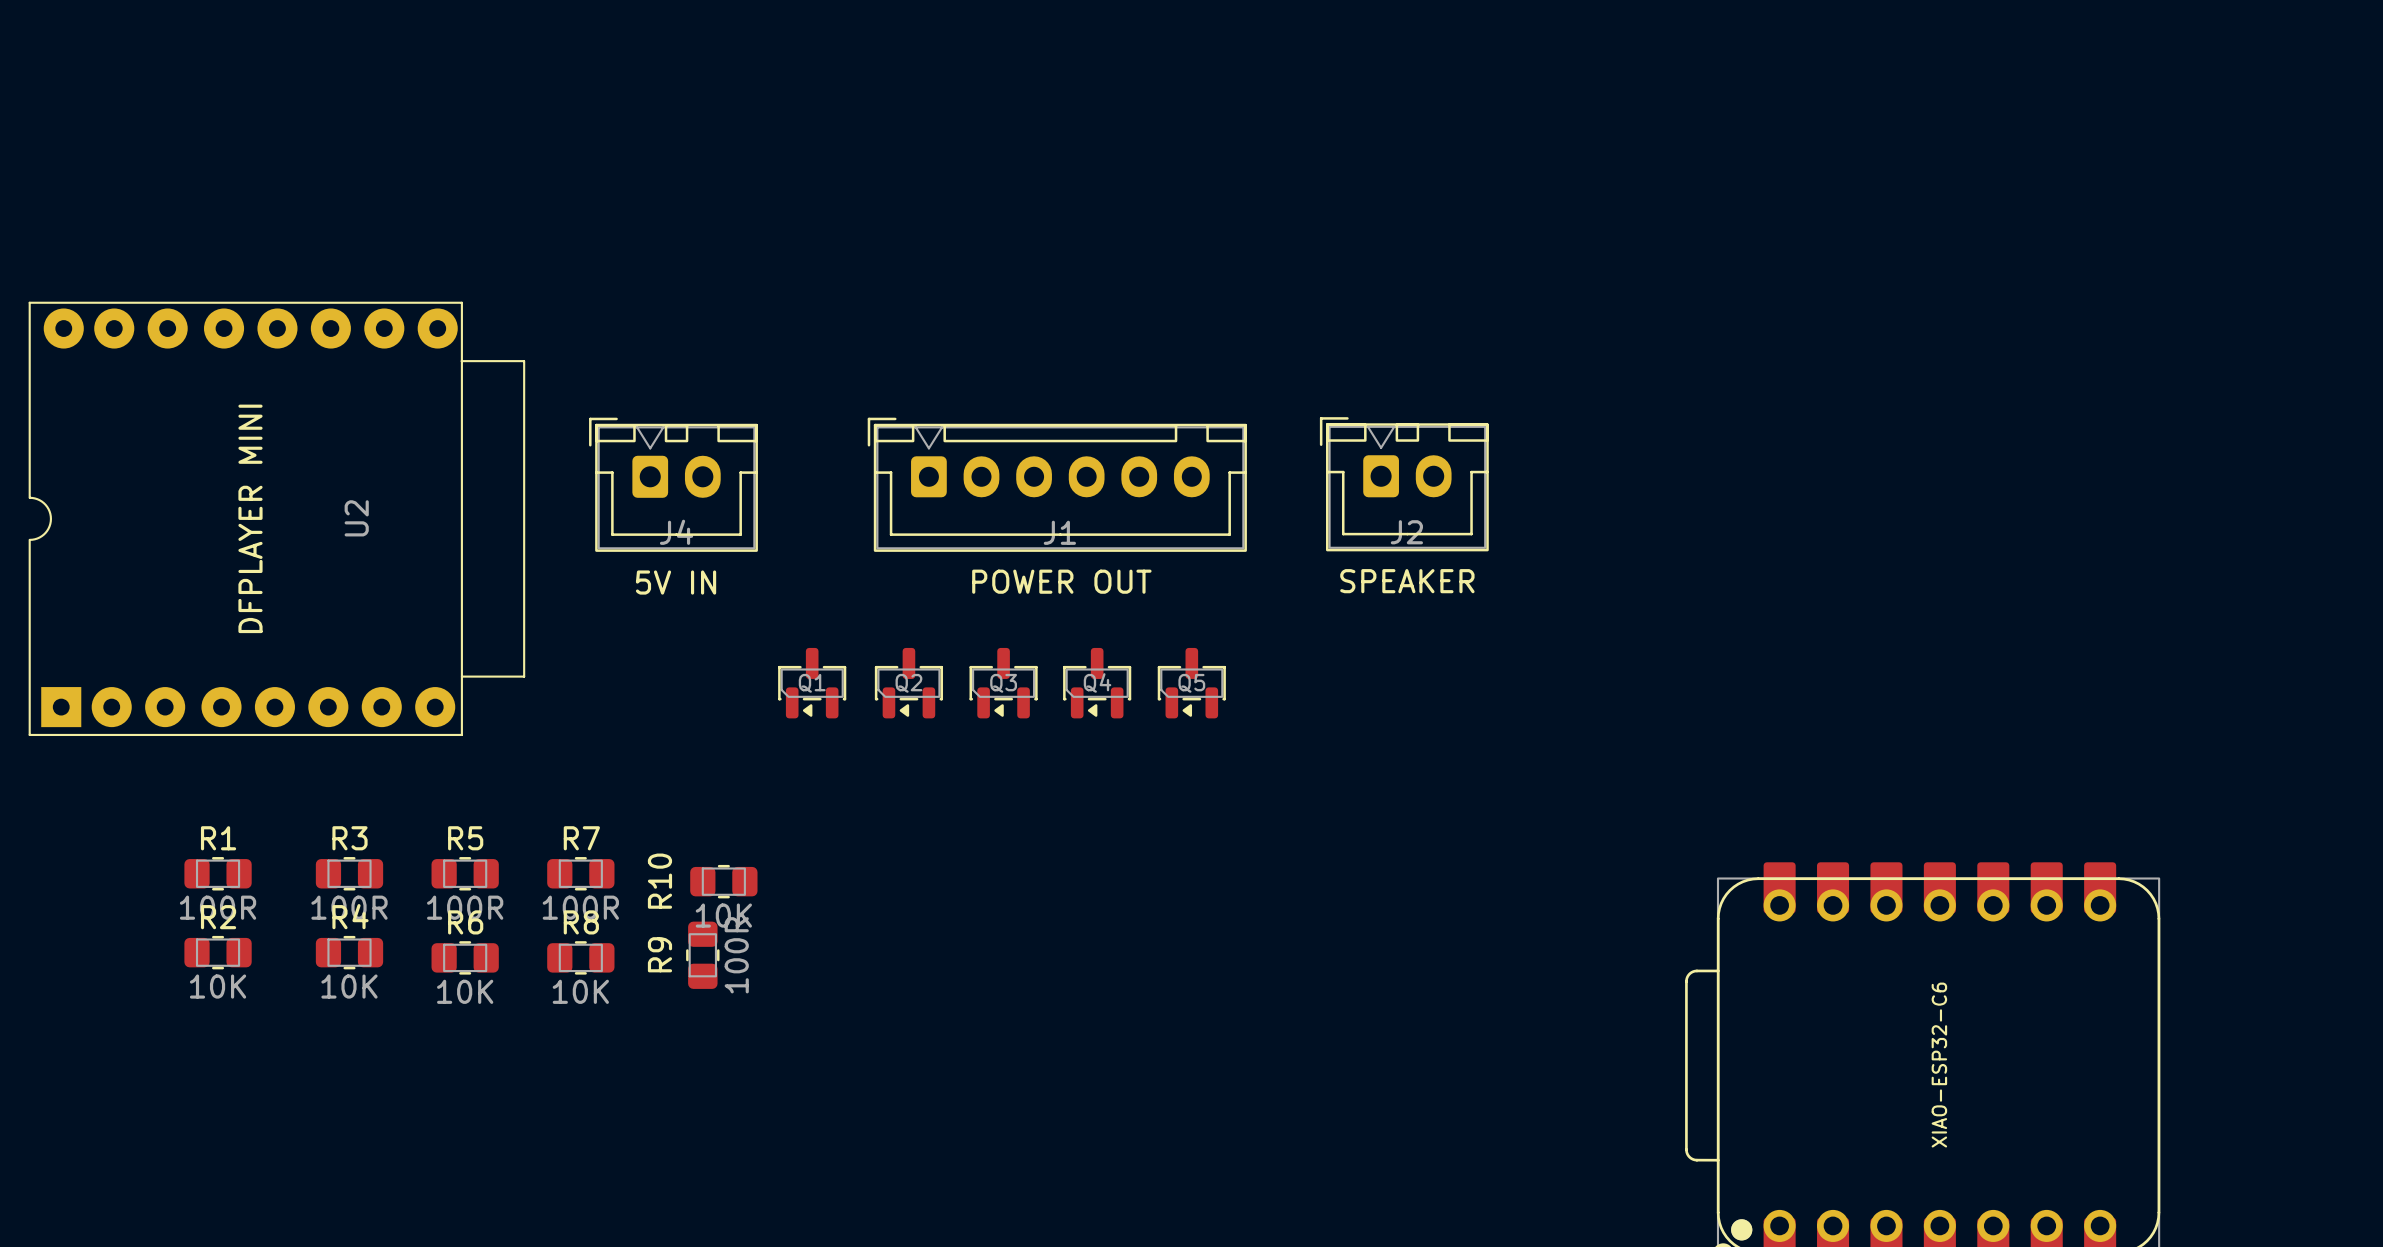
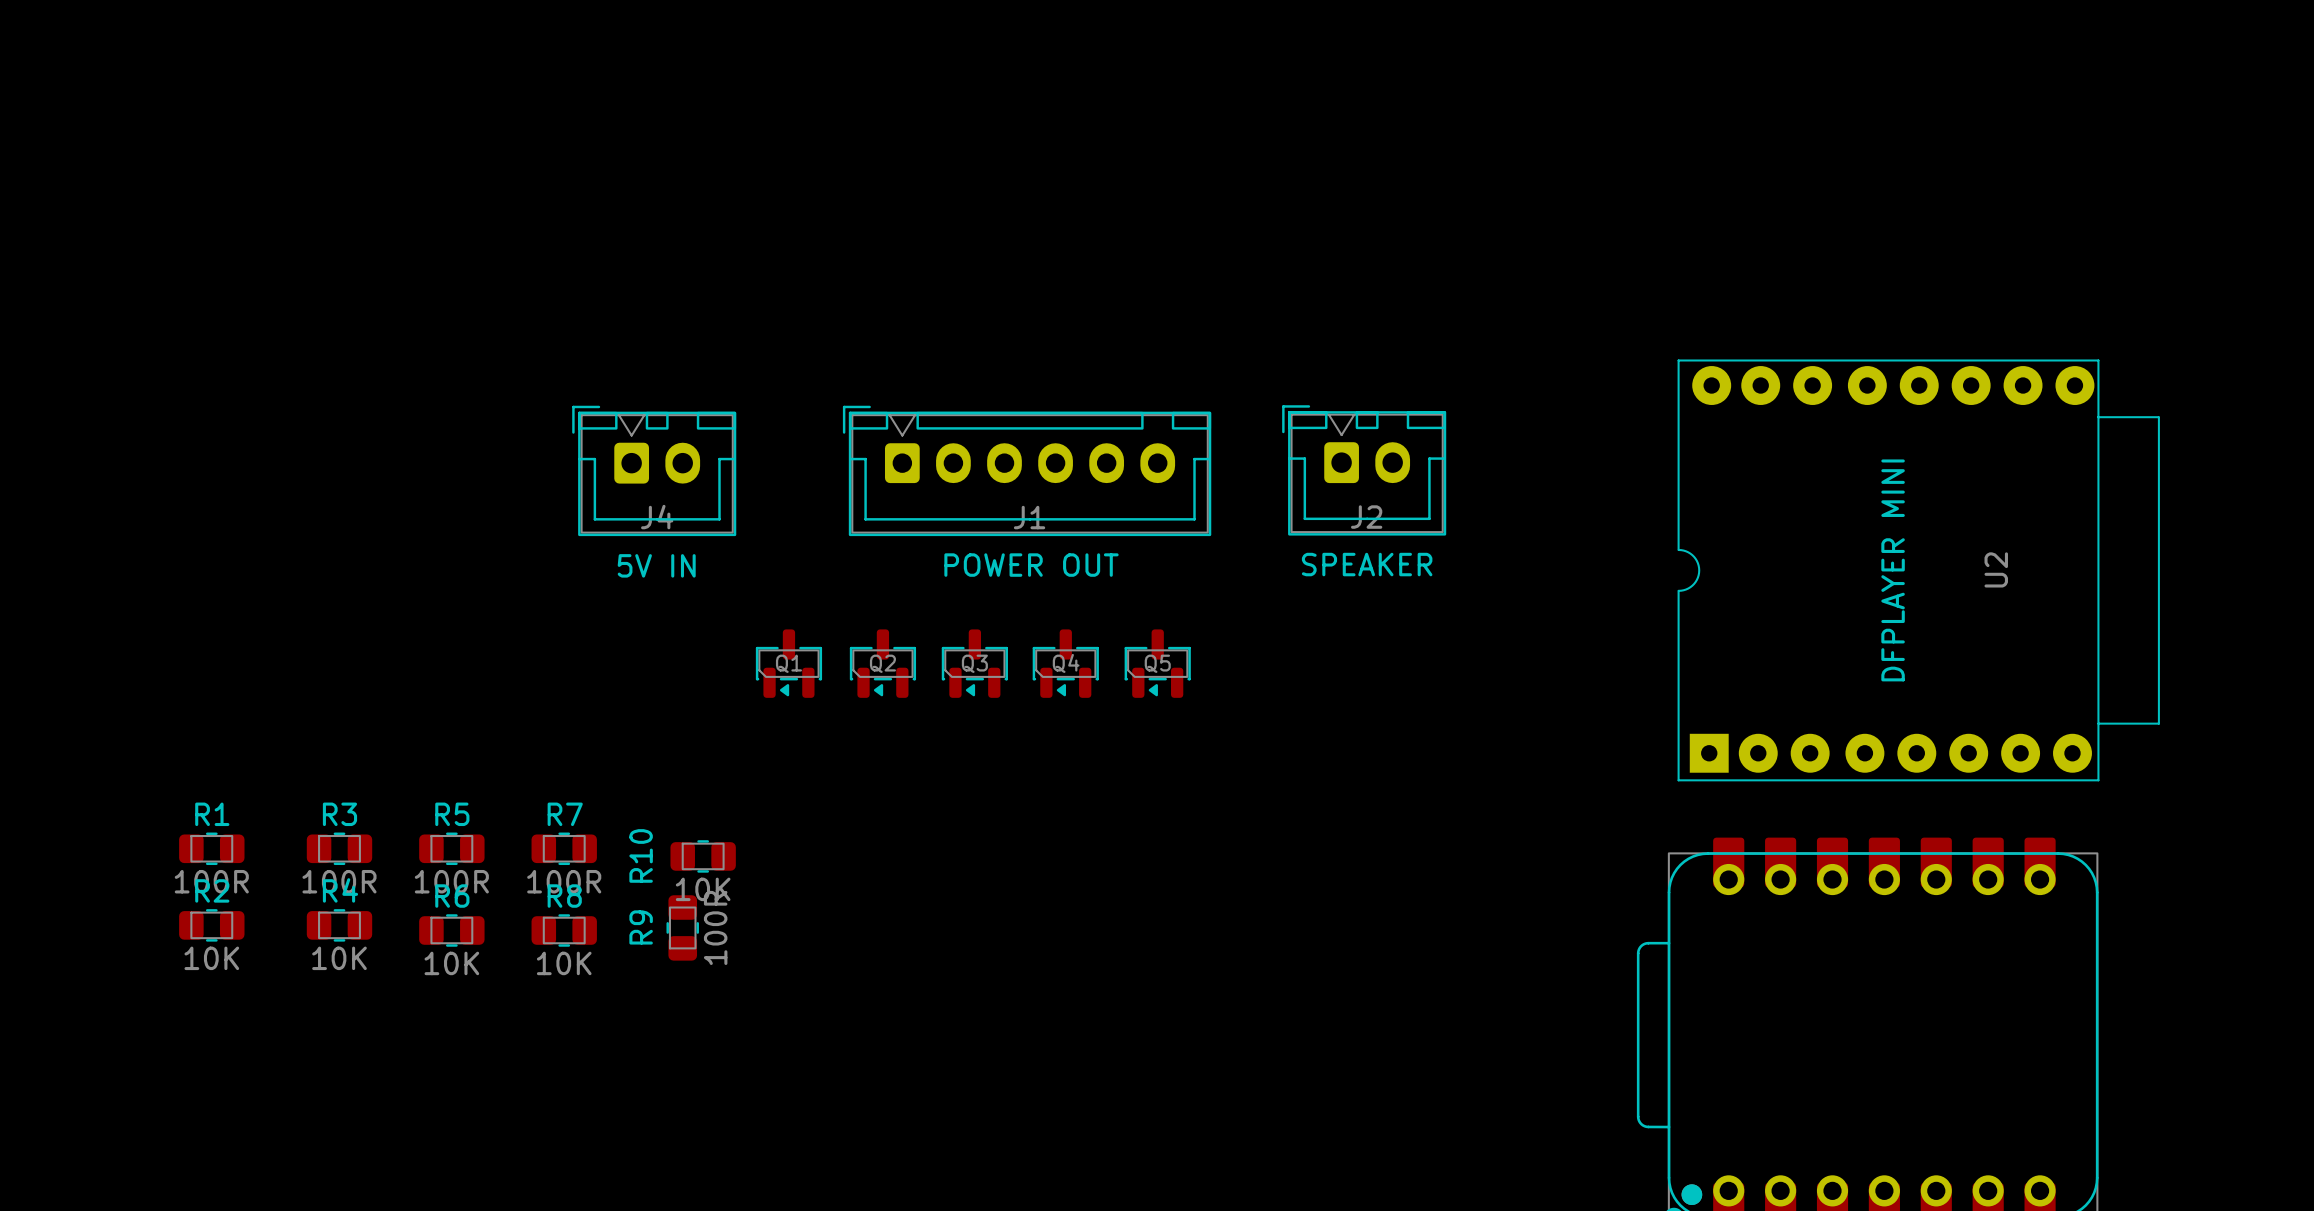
U2 position: (276, 518) -> (1918, 570)
part value: XIAO-ESP32-C6 (1939, 1065) -> none

